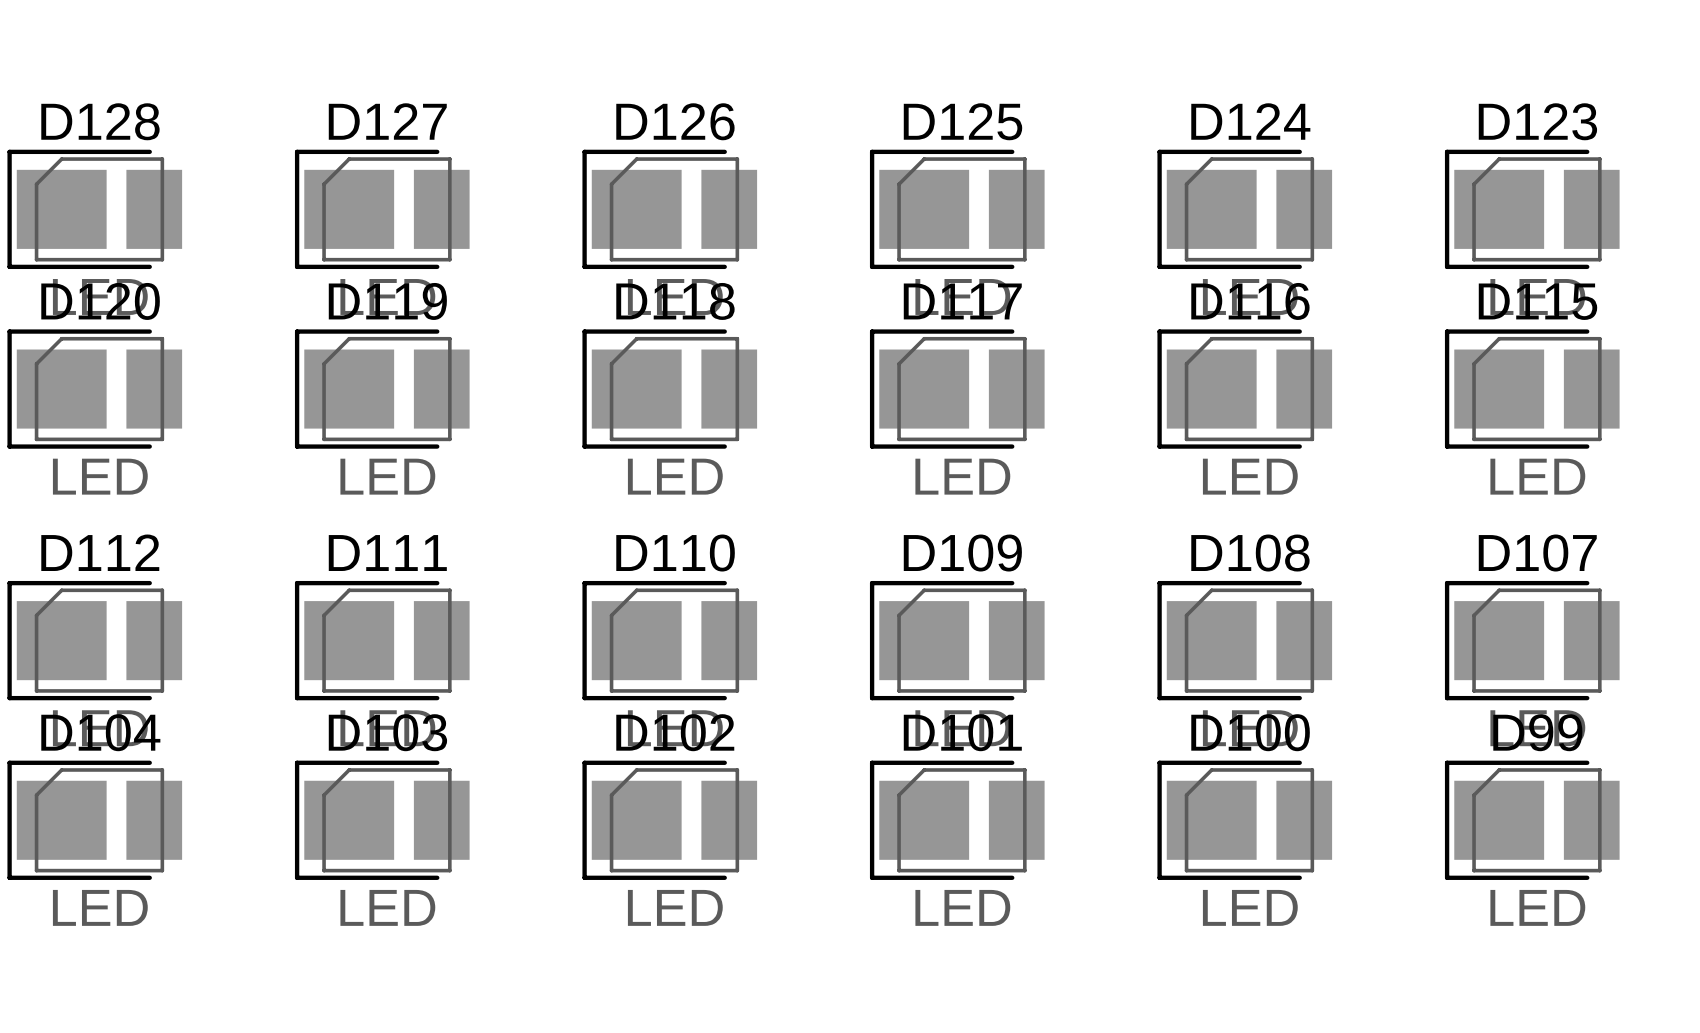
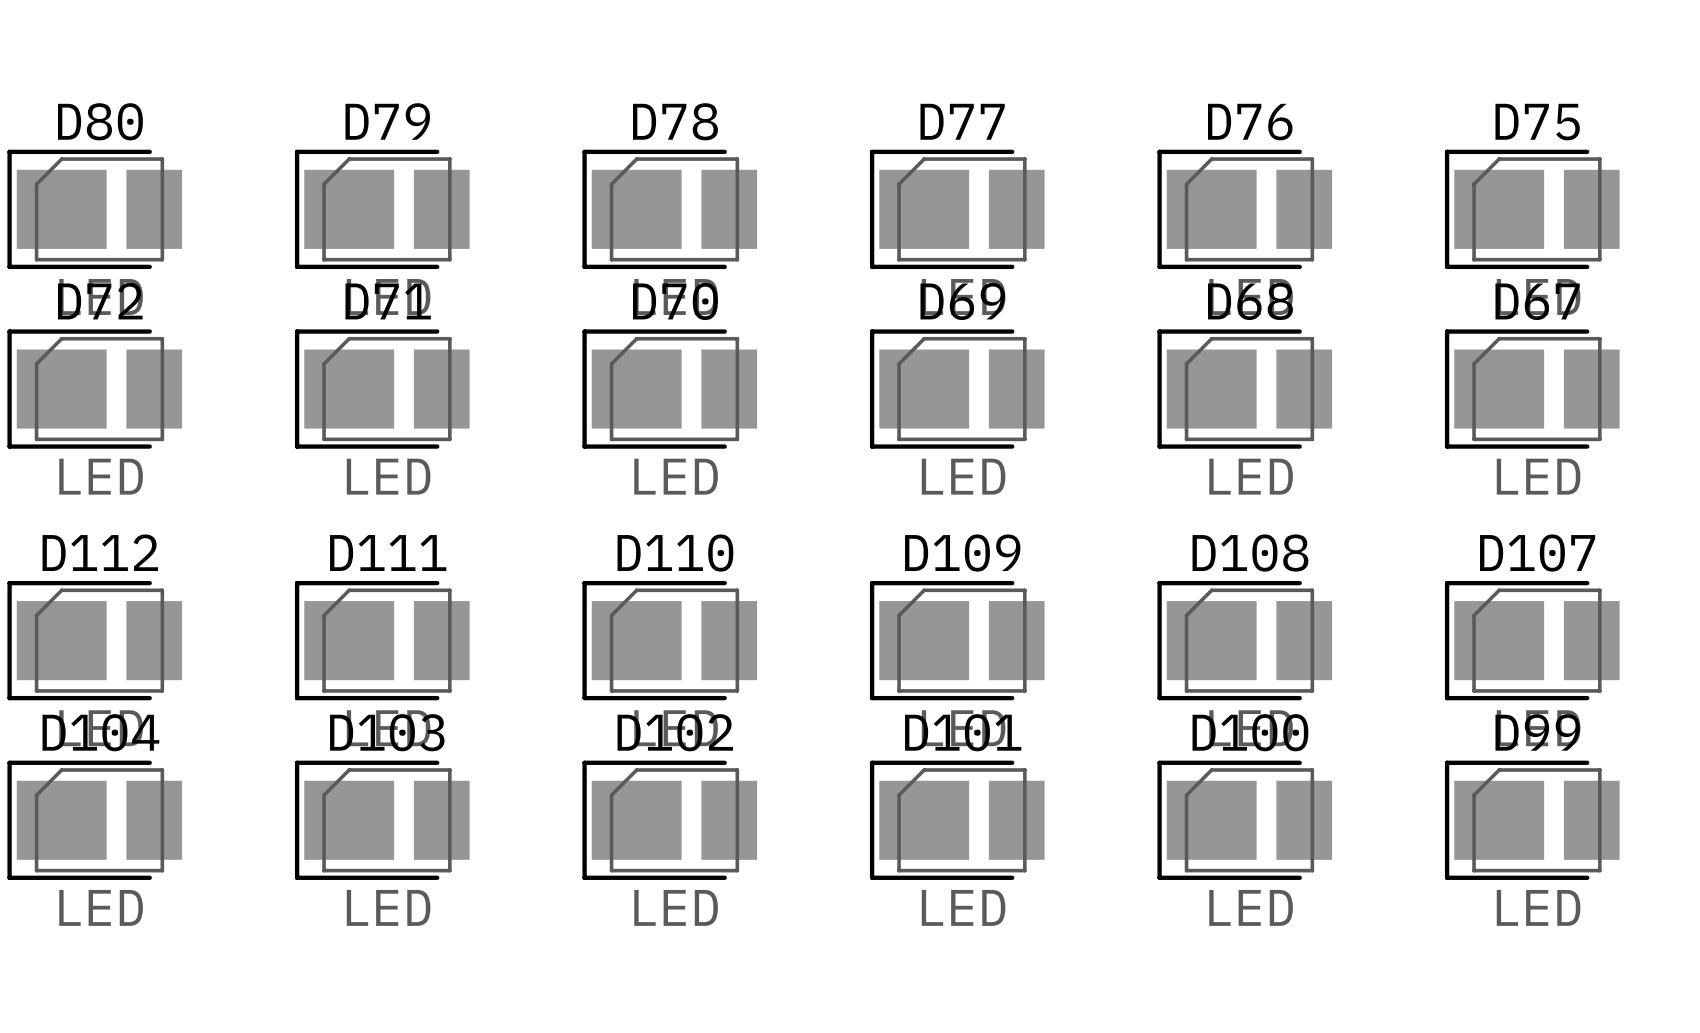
D128 name: D128 (100, 121) -> D80 (100, 121)
D127 name: D127 (387, 121) -> D79 (387, 121)
D126 name: D126 (675, 121) -> D78 (675, 121)
D125 name: D125 (962, 121) -> D77 (962, 121)
D124 name: D124 (1250, 121) -> D76 (1250, 122)
D123 name: D123 (1537, 121) -> D75 (1537, 122)
D120 name: D120 (100, 301) -> D72 (100, 301)
D119 name: D119 (387, 301) -> D71 (388, 301)
D118 name: D118 (675, 301) -> D70 (675, 301)
D117 name: D117 (962, 301) -> D69 (962, 301)
D116 name: D116 (1250, 301) -> D68 (1250, 301)
D115 name: D115 (1537, 301) -> D67 (1537, 301)

